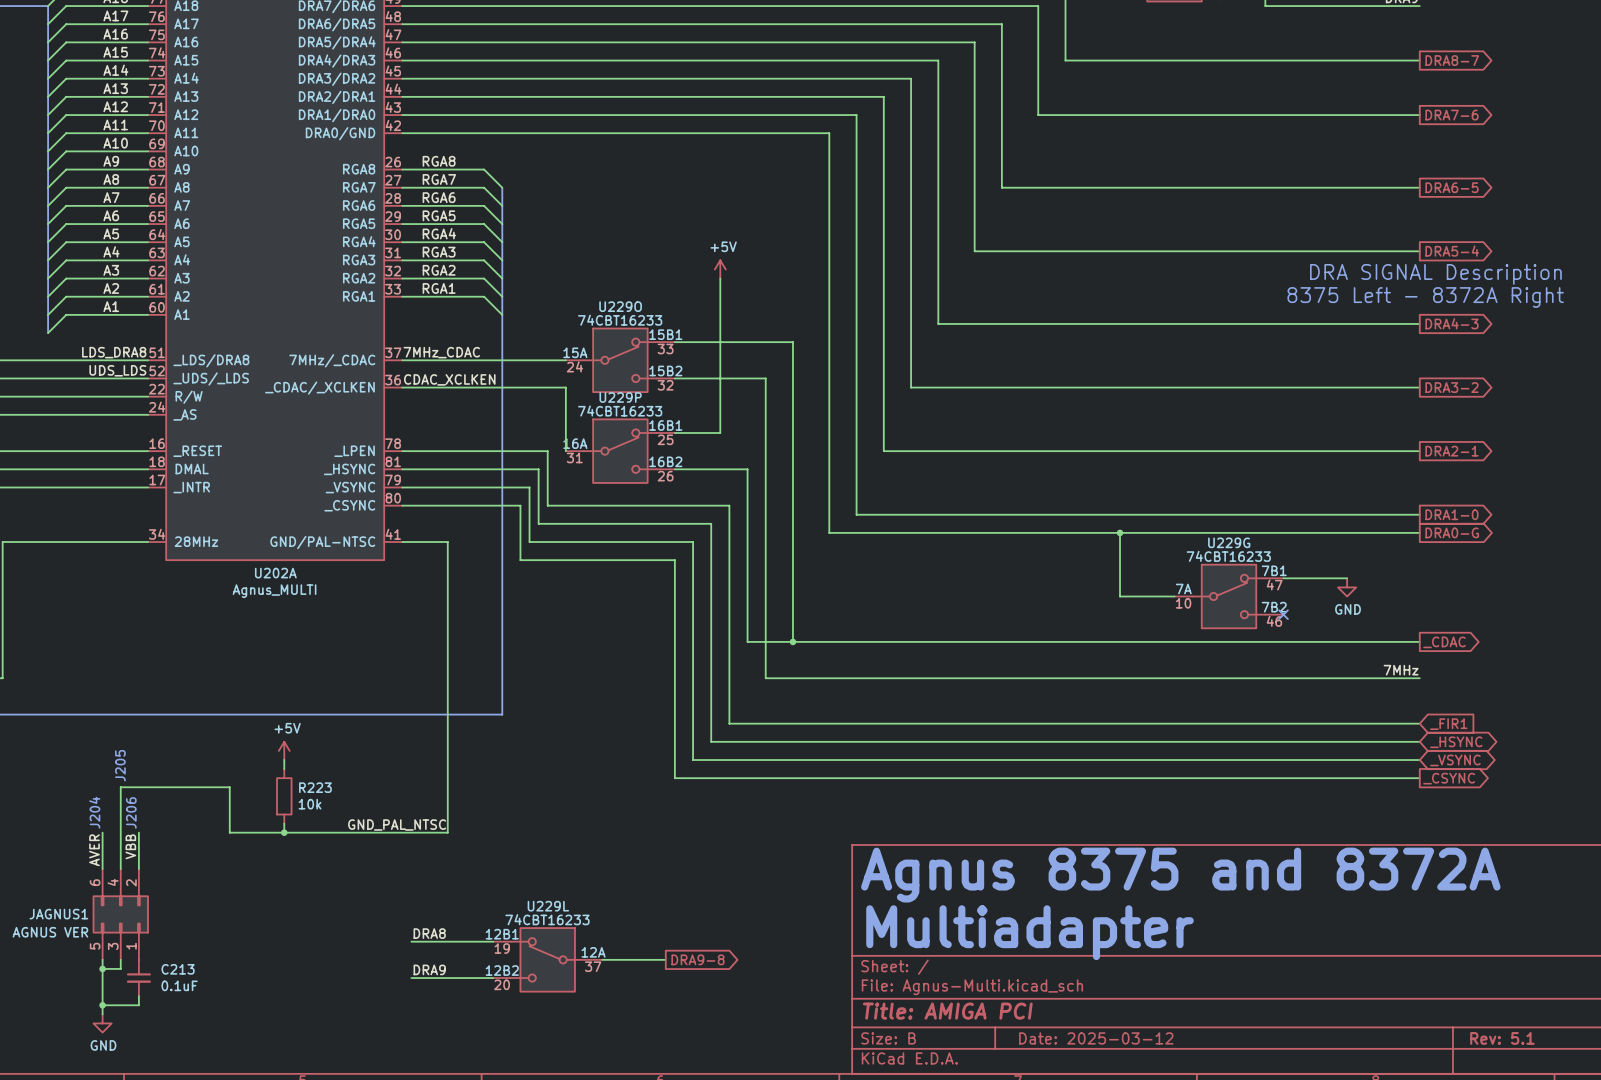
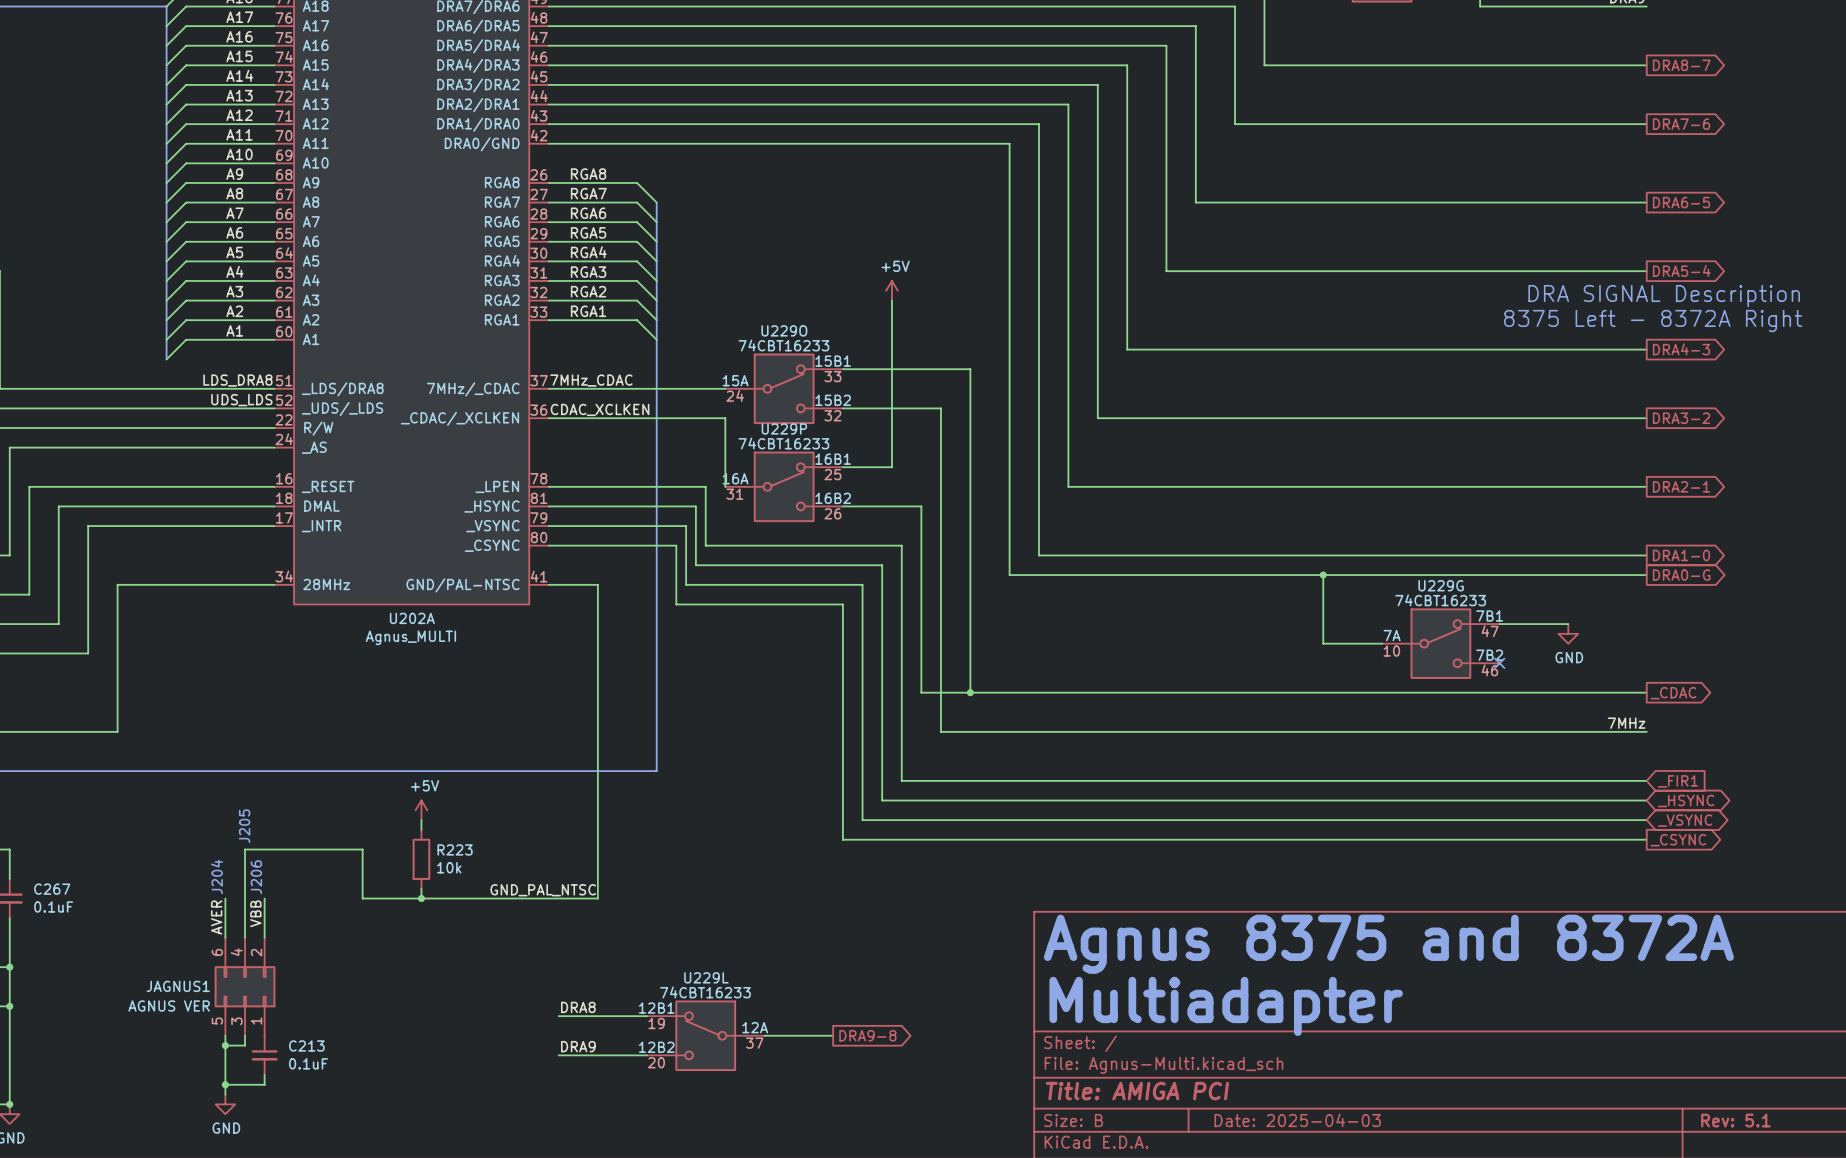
title block: Date: 2025-03-12 (1096, 1038) -> Date: 2025-04-03 (1297, 1120)

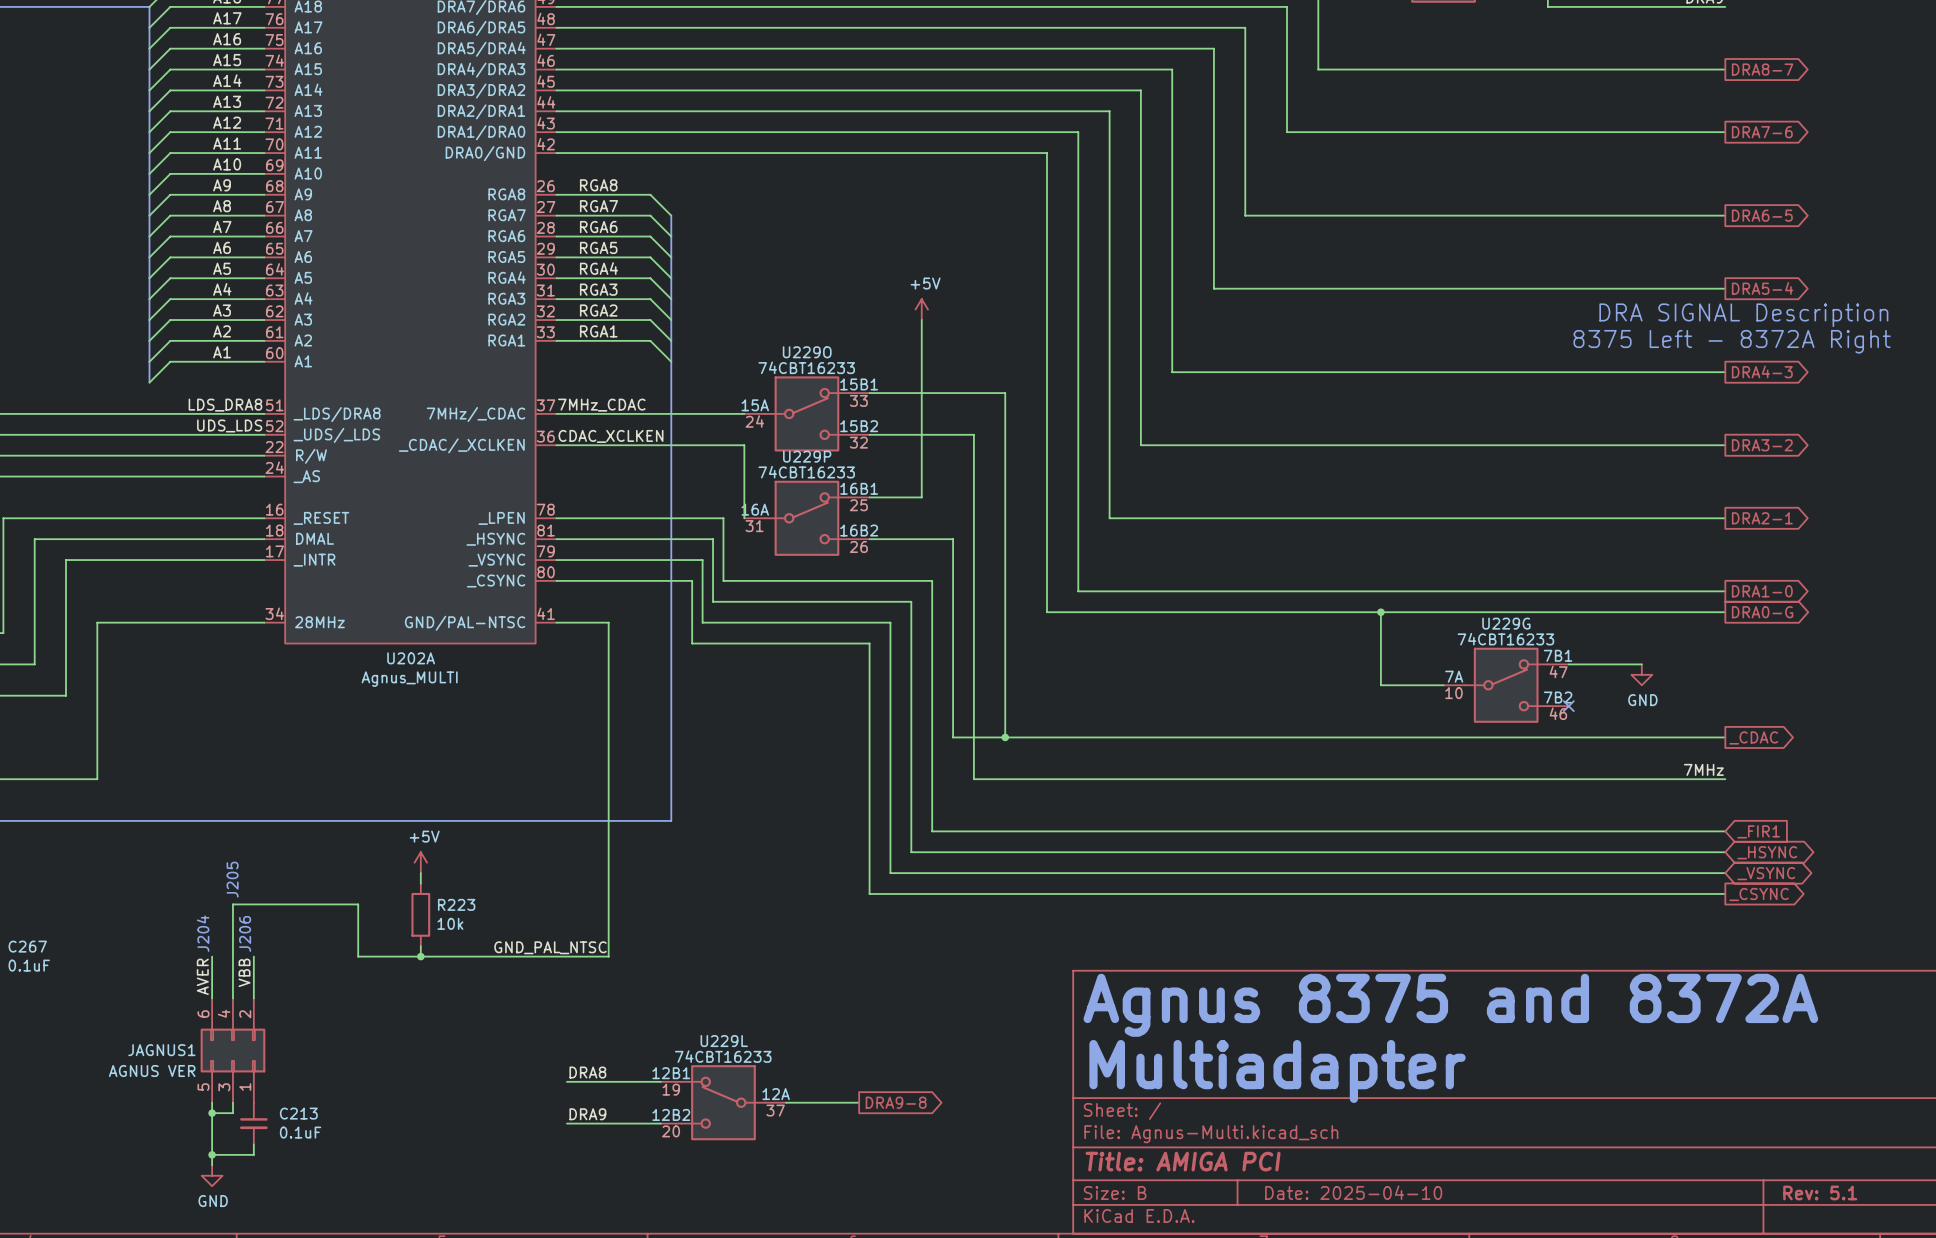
title block: Date: 2025-04-03 (1297, 1120) -> Date: 2025-04-10 (1353, 1192)

